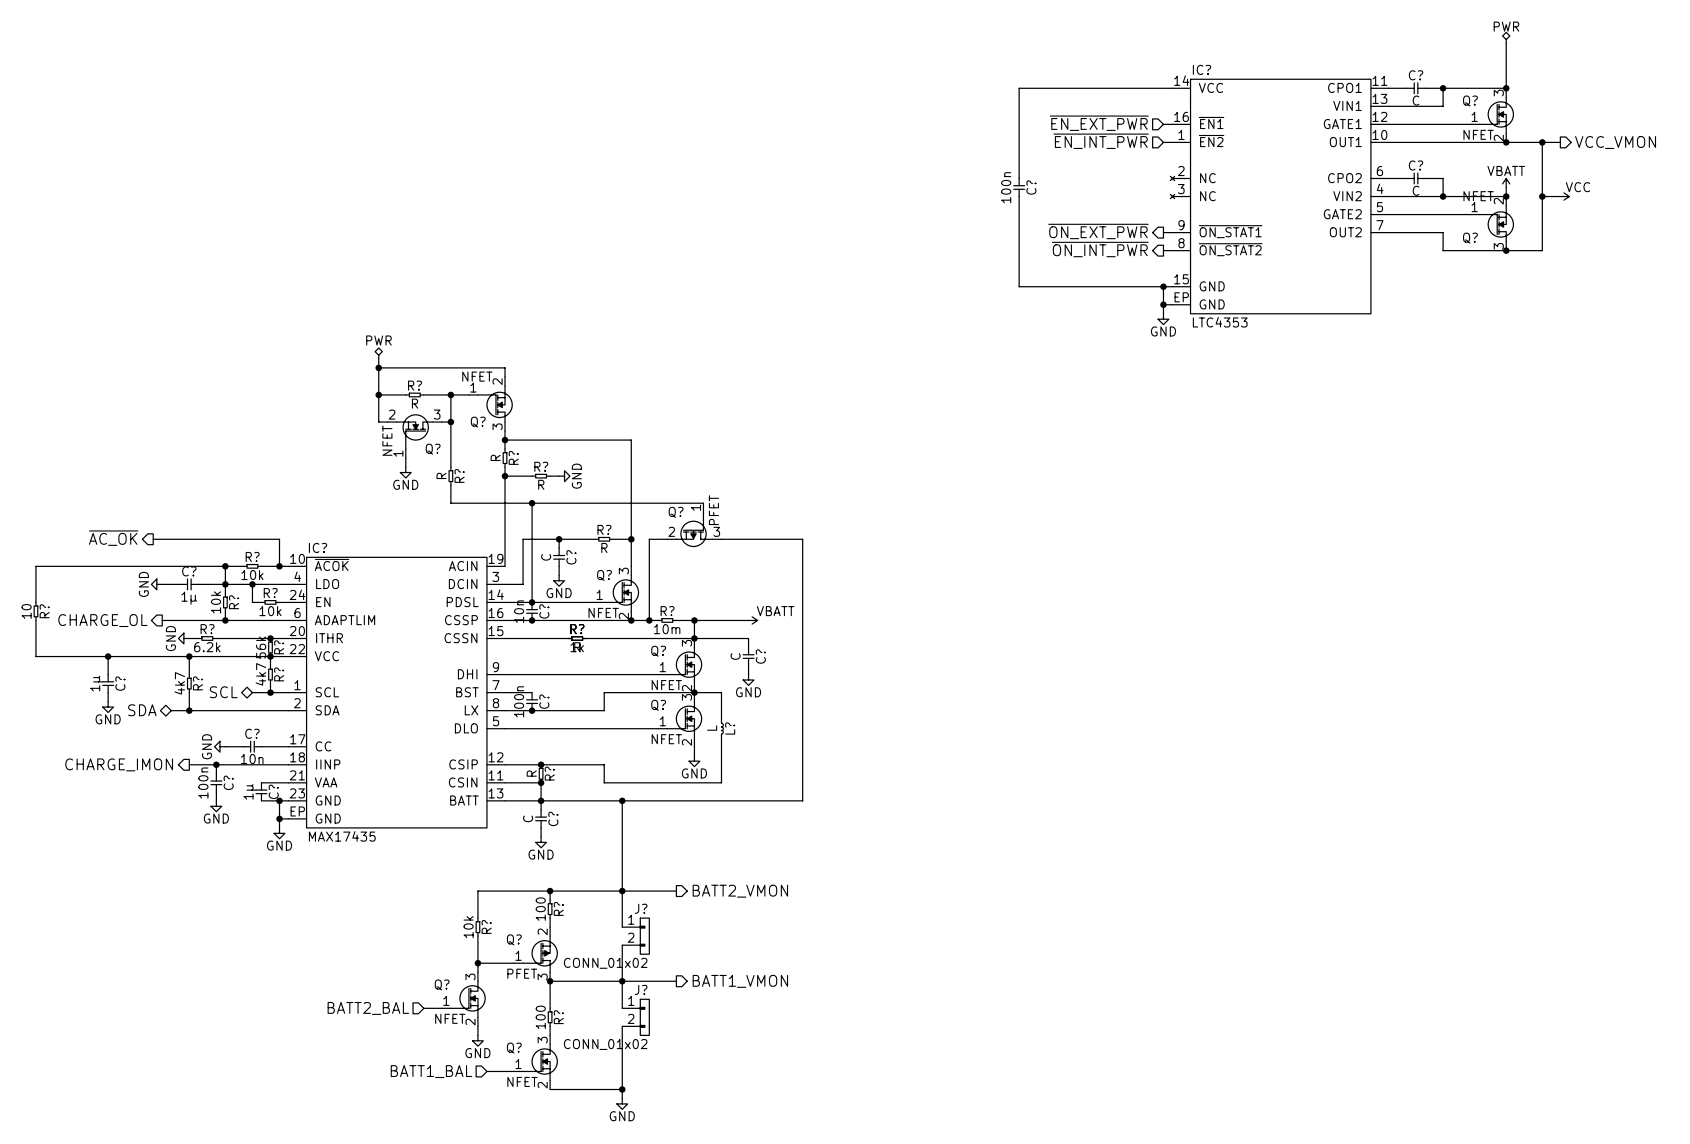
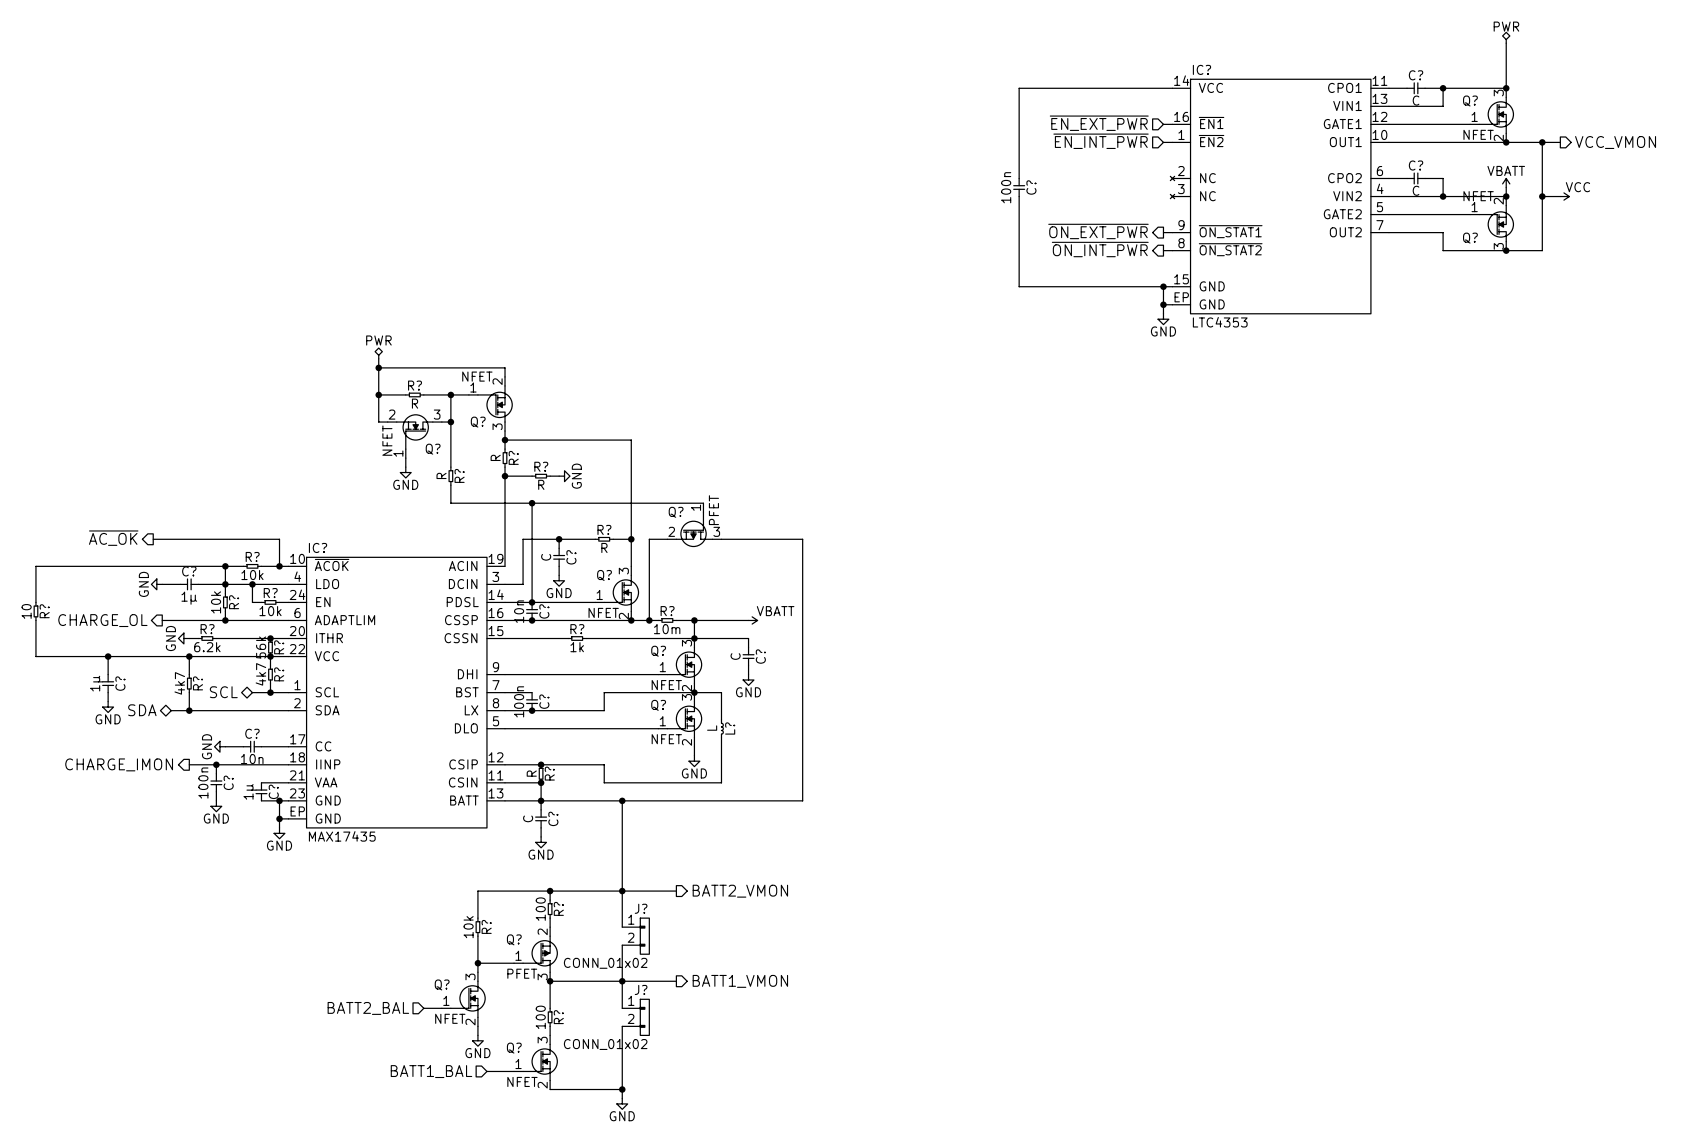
R?: R (577, 638) -> none

